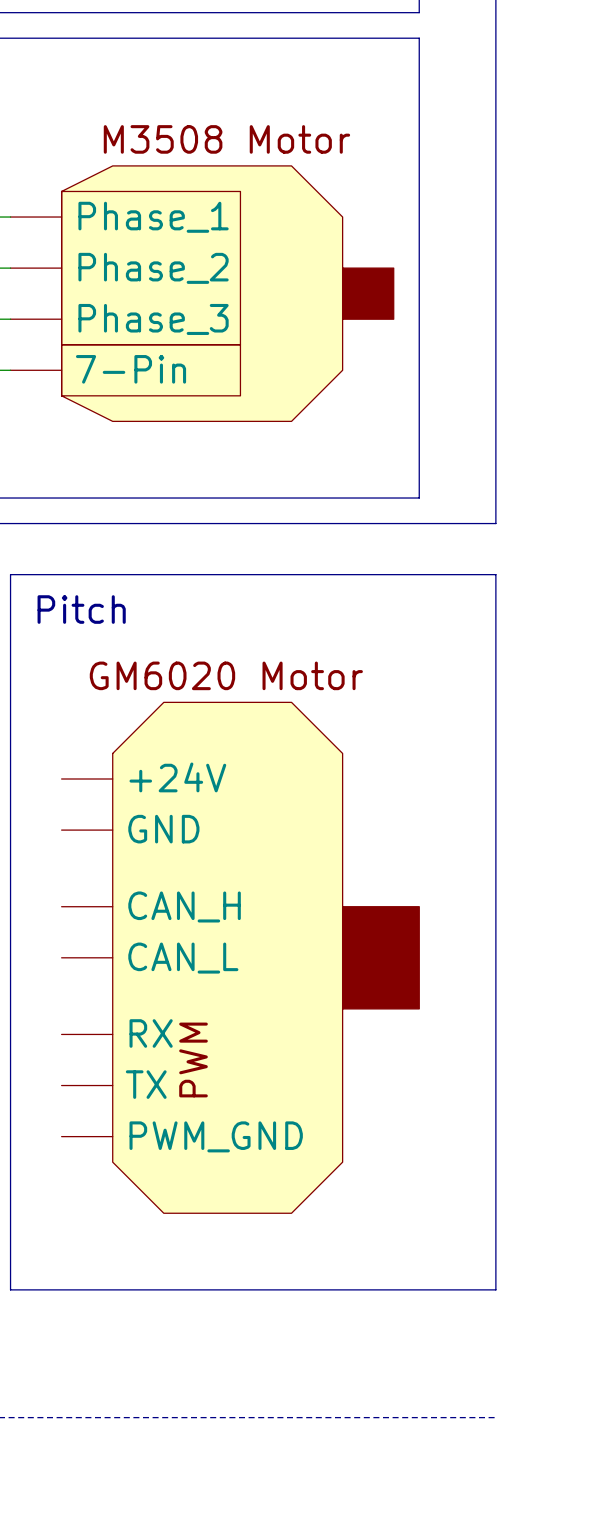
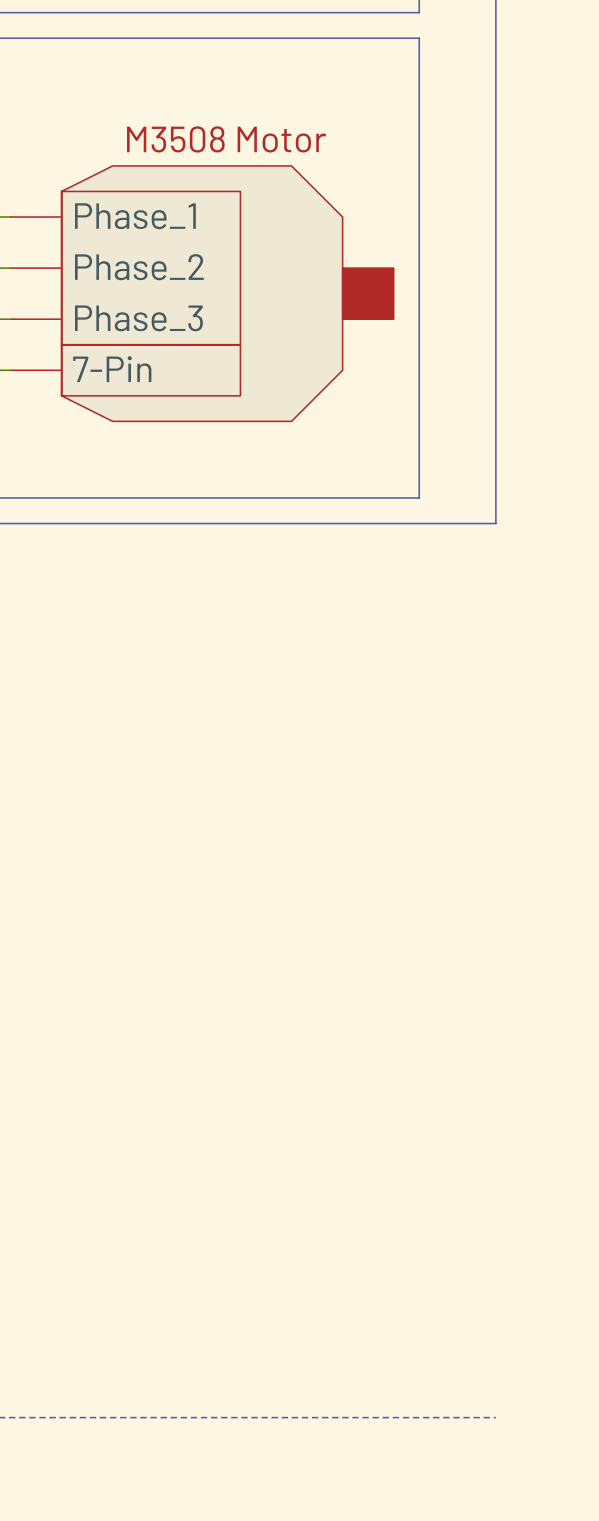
line: (10, 574) (495, 574) (495, 1289) (10, 1289) (10, 574) -> none
text: Pitch (81, 609) -> none
part: (240, 957) -> none

